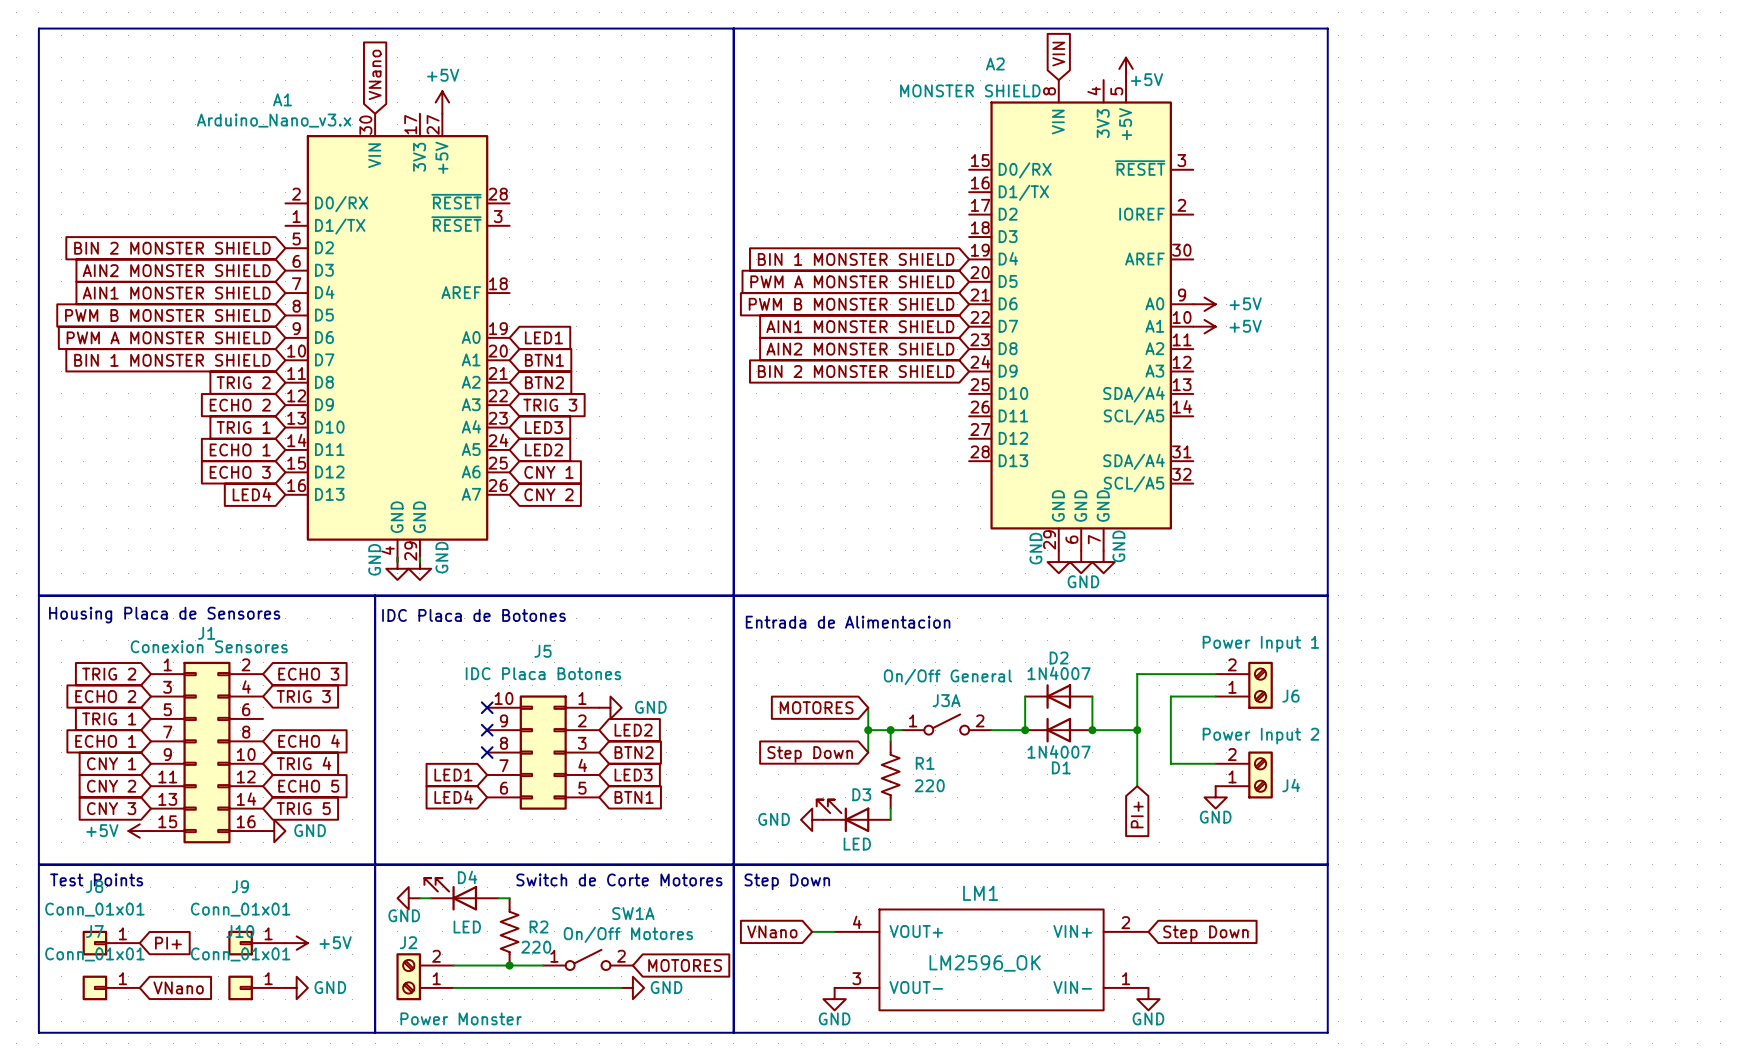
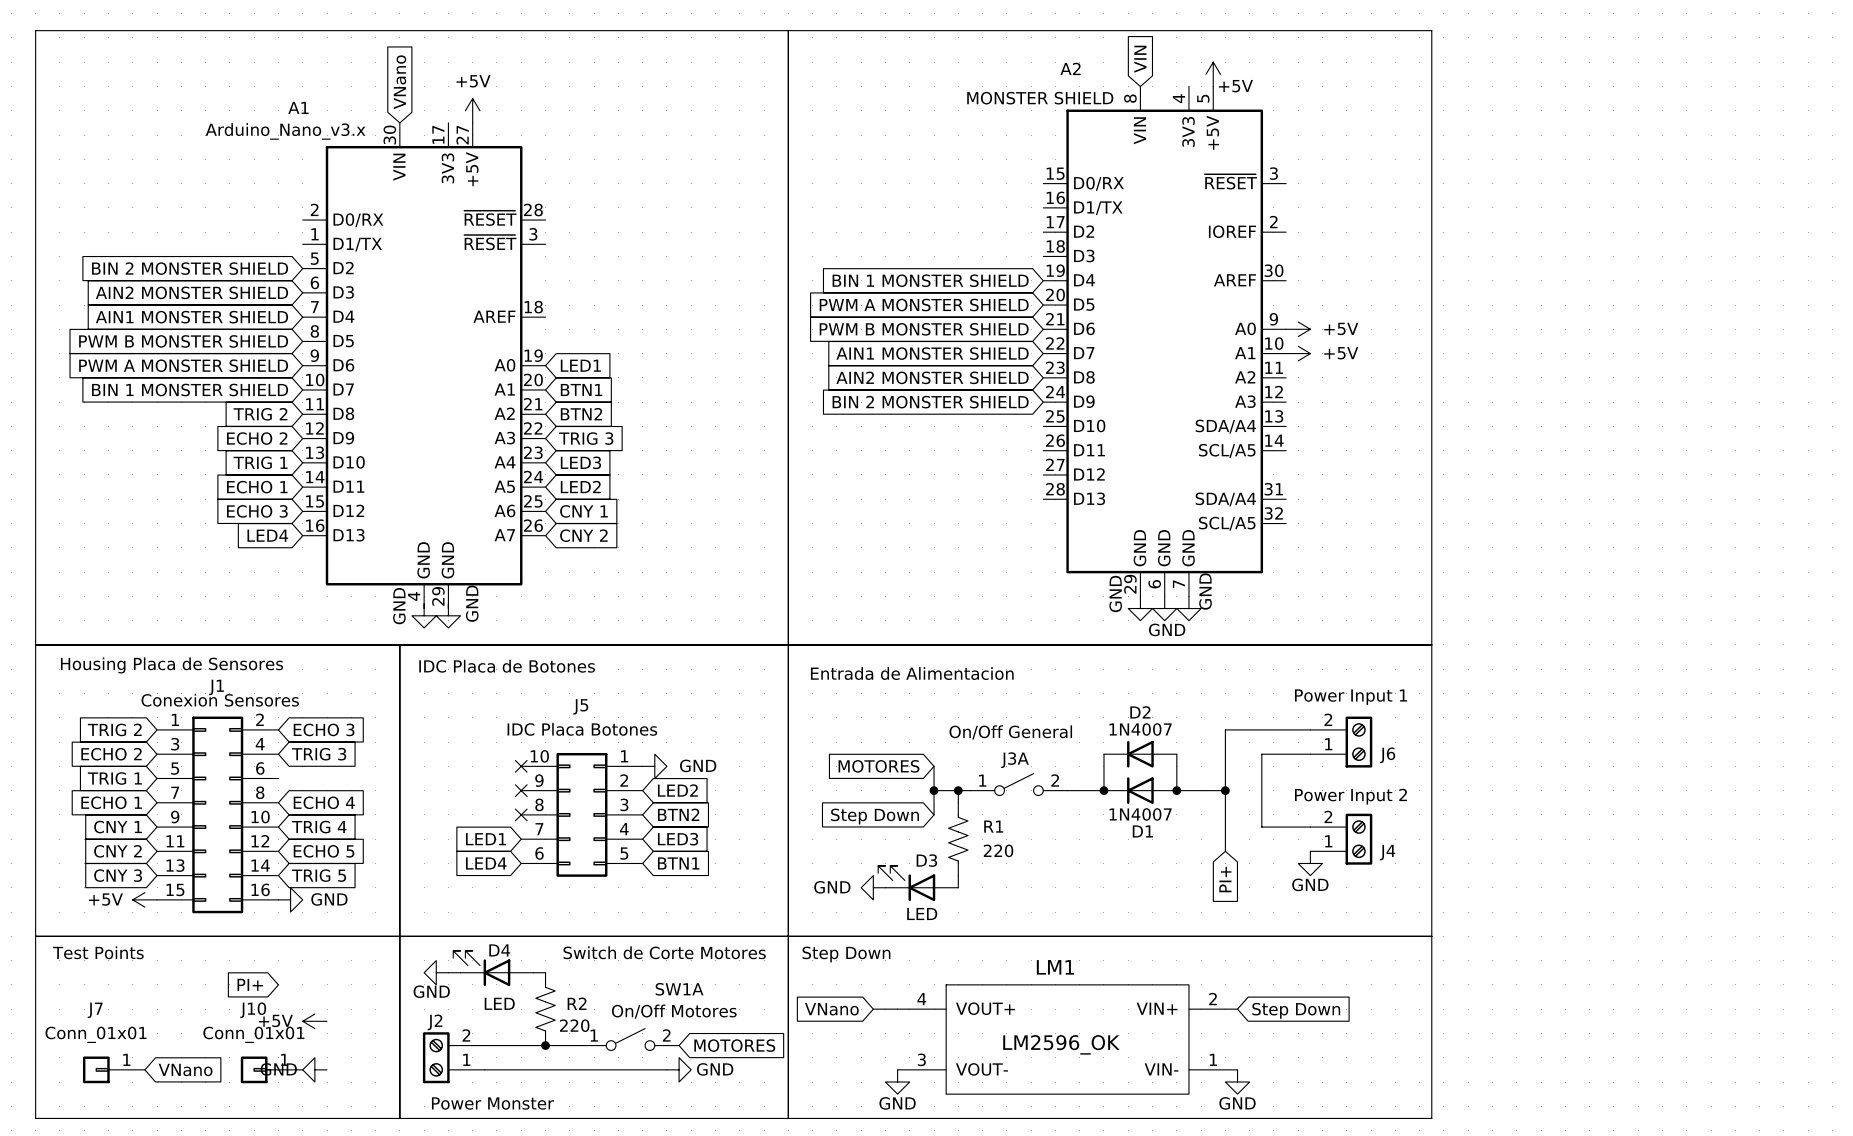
J8: Conn_01x01 (111, 943) -> none
global label rotation: 0° (168, 943) -> 180° (250, 984)
global label position: PI+ (168, 943) -> PI+ (250, 984)
J9: Conn_01x01 (256, 943) -> none
power symbol rotation: 0° (296, 943) -> 180° (314, 1021)
power symbol rotation: 0° (296, 987) -> 180° (314, 1069)

